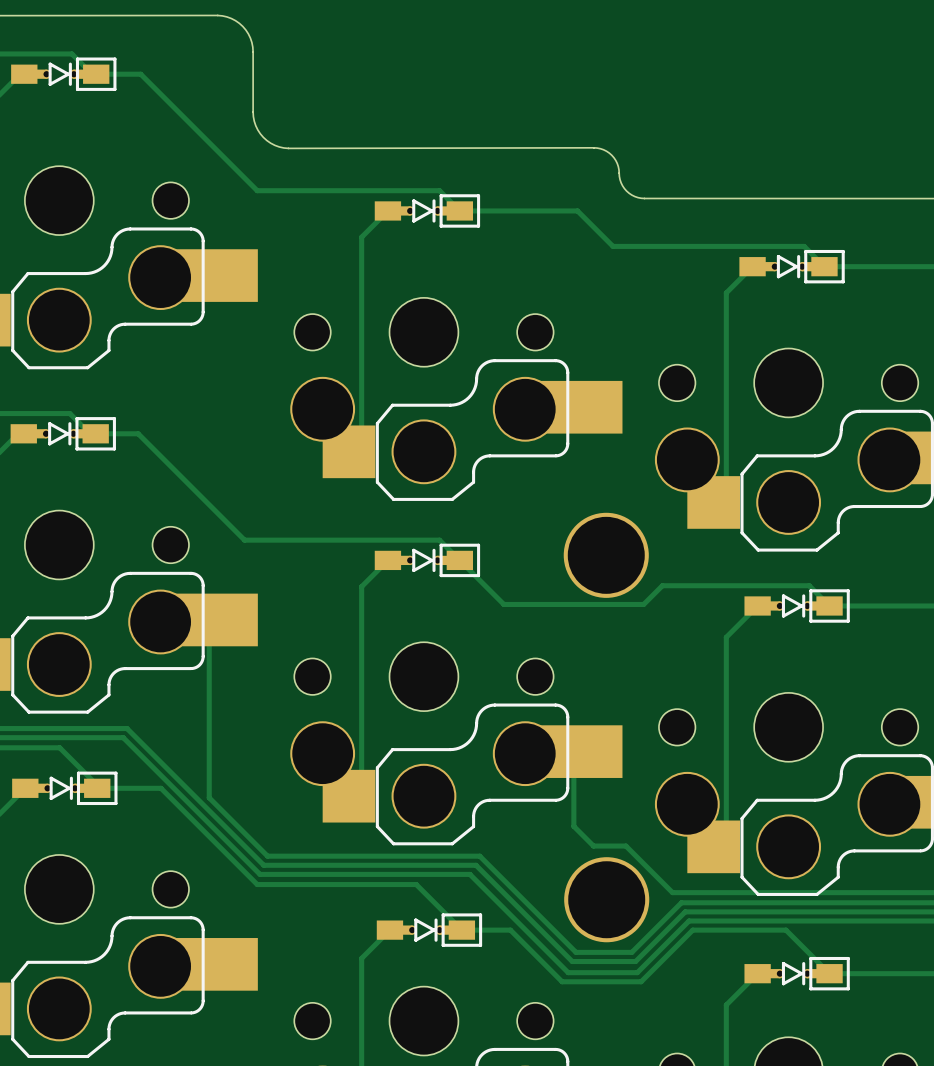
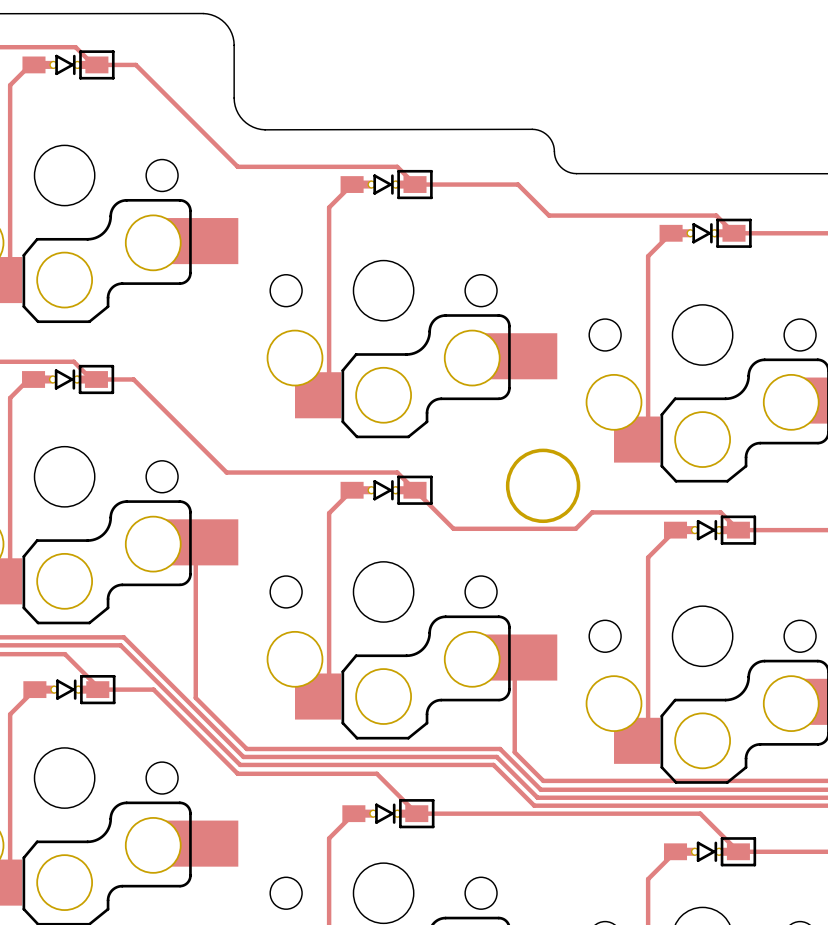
track: (573, 826) (593, 846) (625, 846) (672, 892) -> (514, 722) (514, 752) (543, 780) (601, 780)
track: (479, 856) (576, 952) (631, 952) (681, 902) -> (432, 748) (500, 748) (540, 789) (608, 789)
track: (476, 865) (572, 961) (635, 961) (685, 911) -> (429, 756) (496, 756) (537, 797) (612, 797)
track: (469, 874) (568, 972) (637, 972) (689, 921) -> (423, 764) (493, 764) (534, 805) (615, 805)
part: (606, 899) -> none
track: (510, 930) (562, 981) (641, 981) (692, 930) -> (459, 813) (618, 813)

